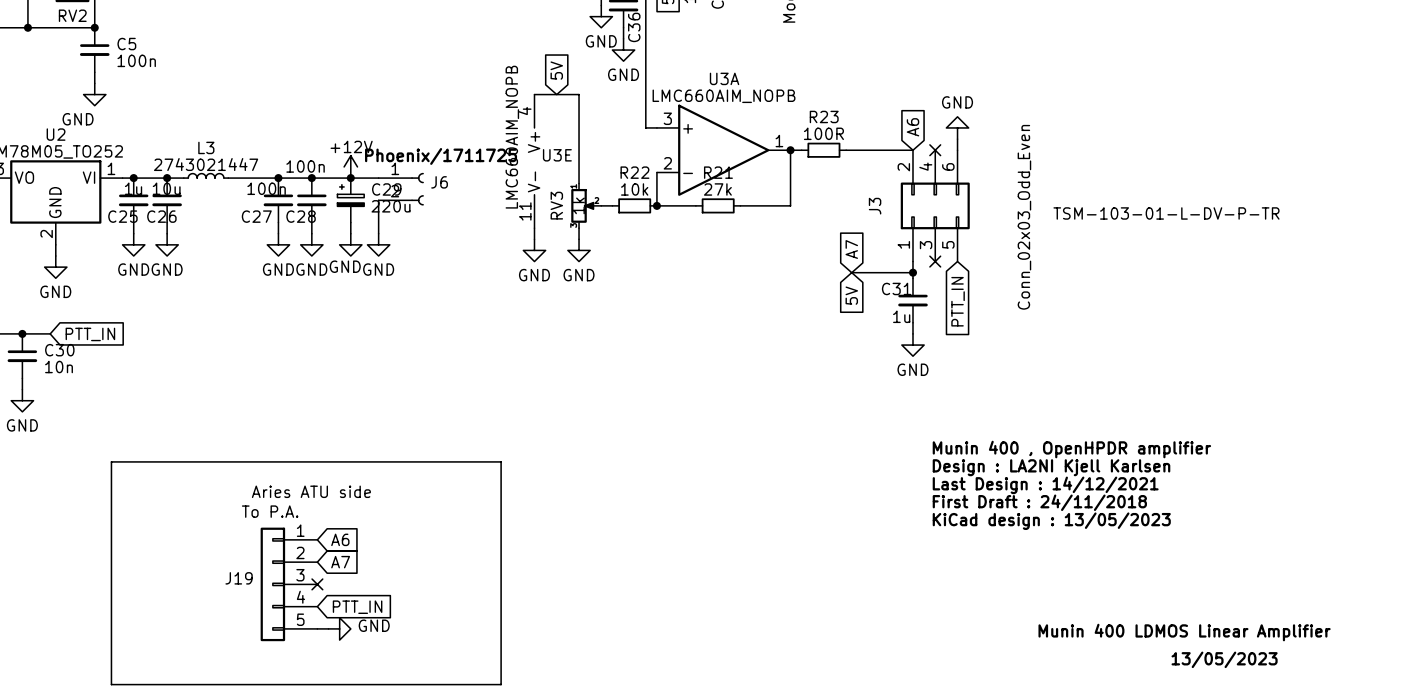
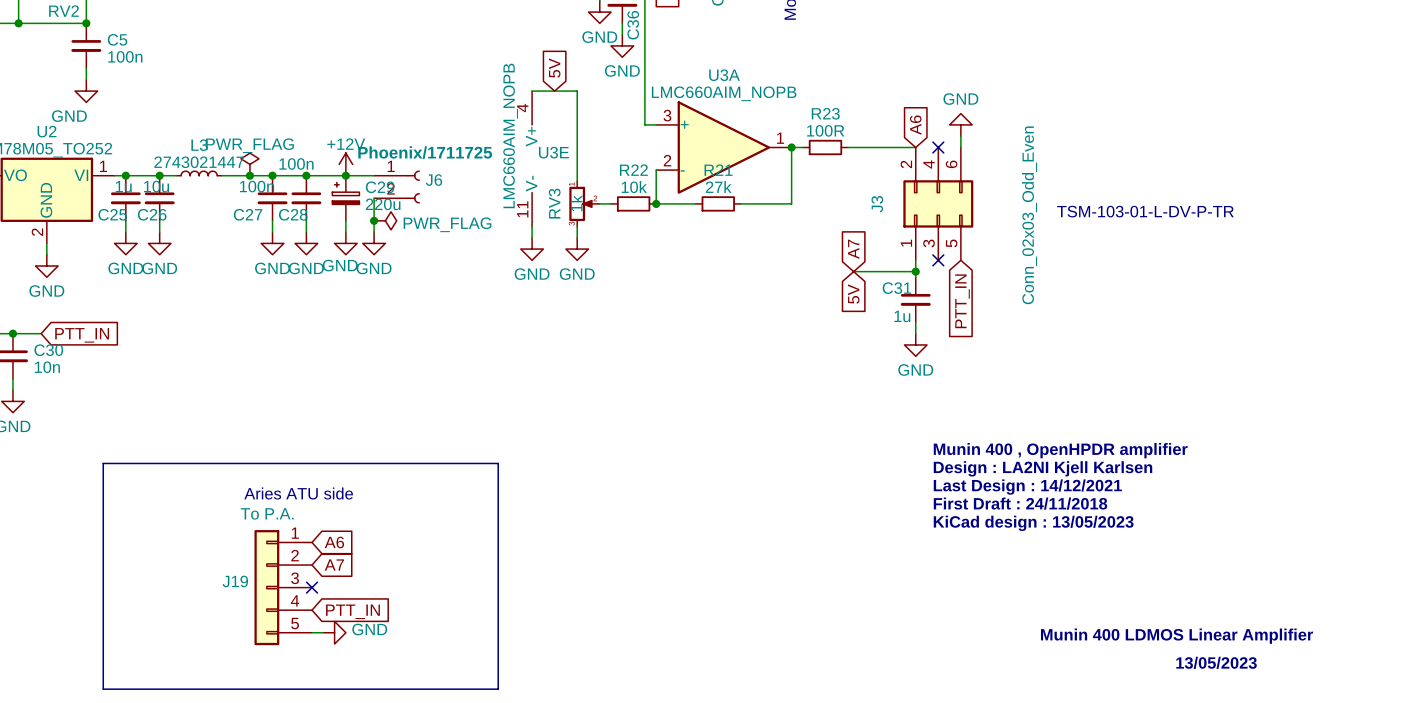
power symbol: none -> PWR_FLAG (249, 164)
junction: none -> (249, 175)
junction: none -> (374, 220)
power symbol: none -> PWR_FLAG (385, 220)

